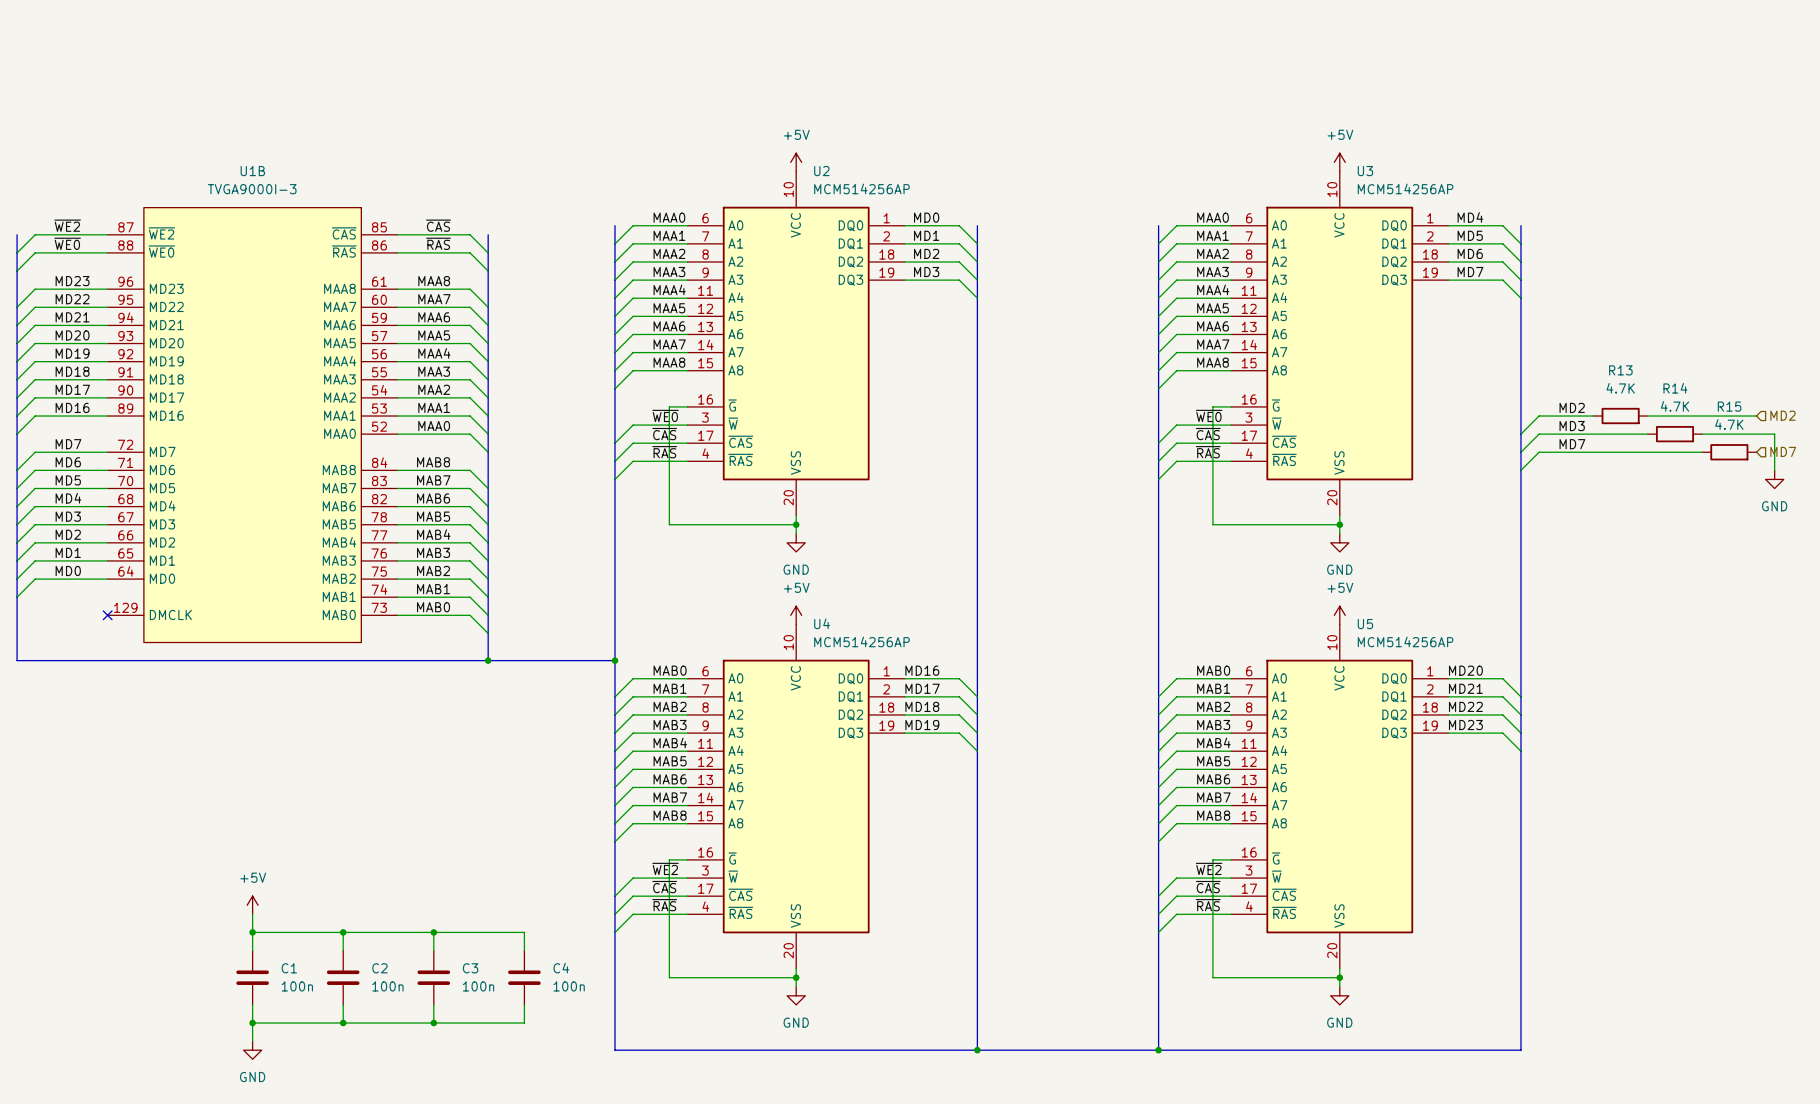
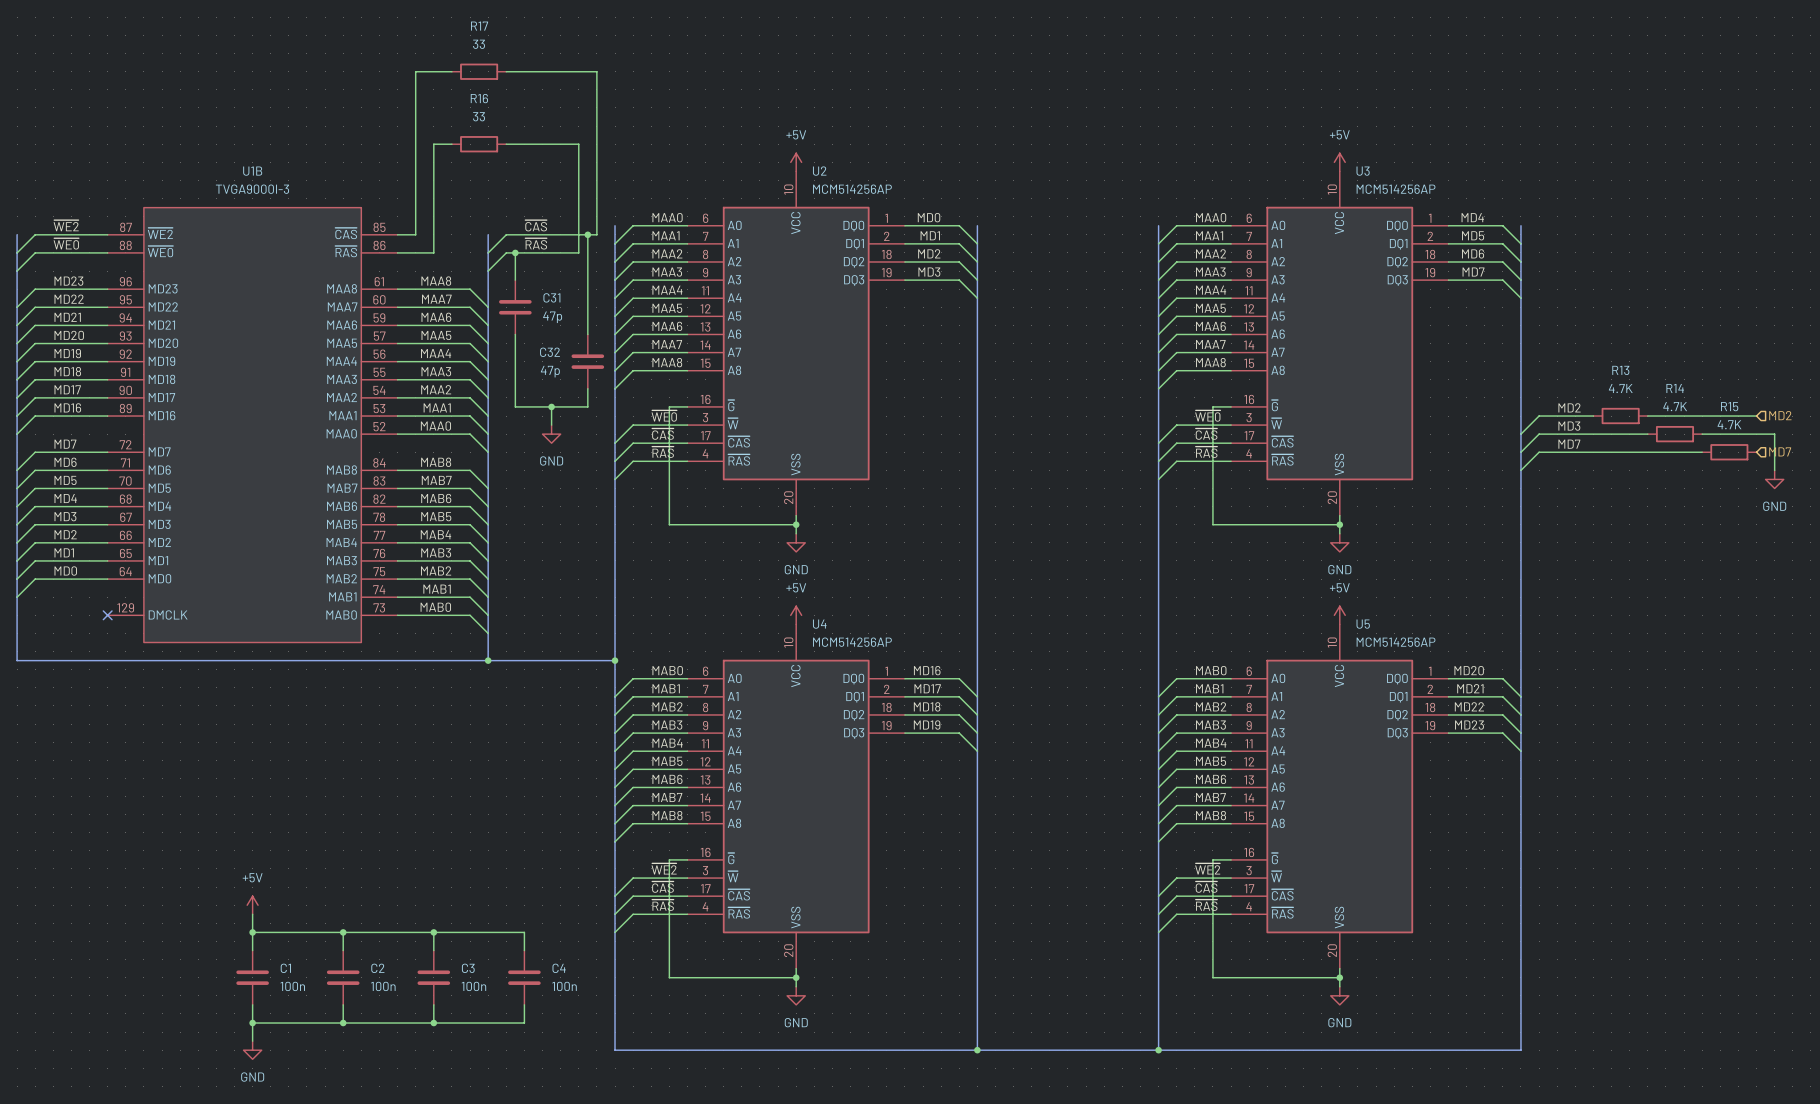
R17: none -> 33 (479, 71)
wire: none -> (506, 71) (596, 71) (596, 234) (506, 234) (488, 252)
wire: none -> (451, 144) (433, 144) (433, 252)
R16: none -> 33 (479, 144)
label position: ~{CAS} (438, 225) -> ~{CAS} (536, 225)
wire: (415, 234) (470, 234) (488, 252) -> (415, 234) (415, 71) (451, 71)
wire: none -> (587, 234) (587, 334)
junction: none -> (587, 234)
label position: ~{RAS} (438, 243) -> ~{RAS} (536, 243)
wire: (433, 252) (470, 252) (488, 271) -> (506, 144) (578, 144) (578, 252) (506, 252) (488, 271)
wire: none -> (515, 252) (515, 280)
junction: none -> (515, 252)
C31: none -> 47p (515, 307)
wire: none -> (515, 334) (515, 406) (587, 406) (587, 388)
C32: none -> 47p (587, 361)
wire: none -> (551, 406) (551, 425)
junction: none -> (551, 406)
power symbol: none -> GND (551, 434)

